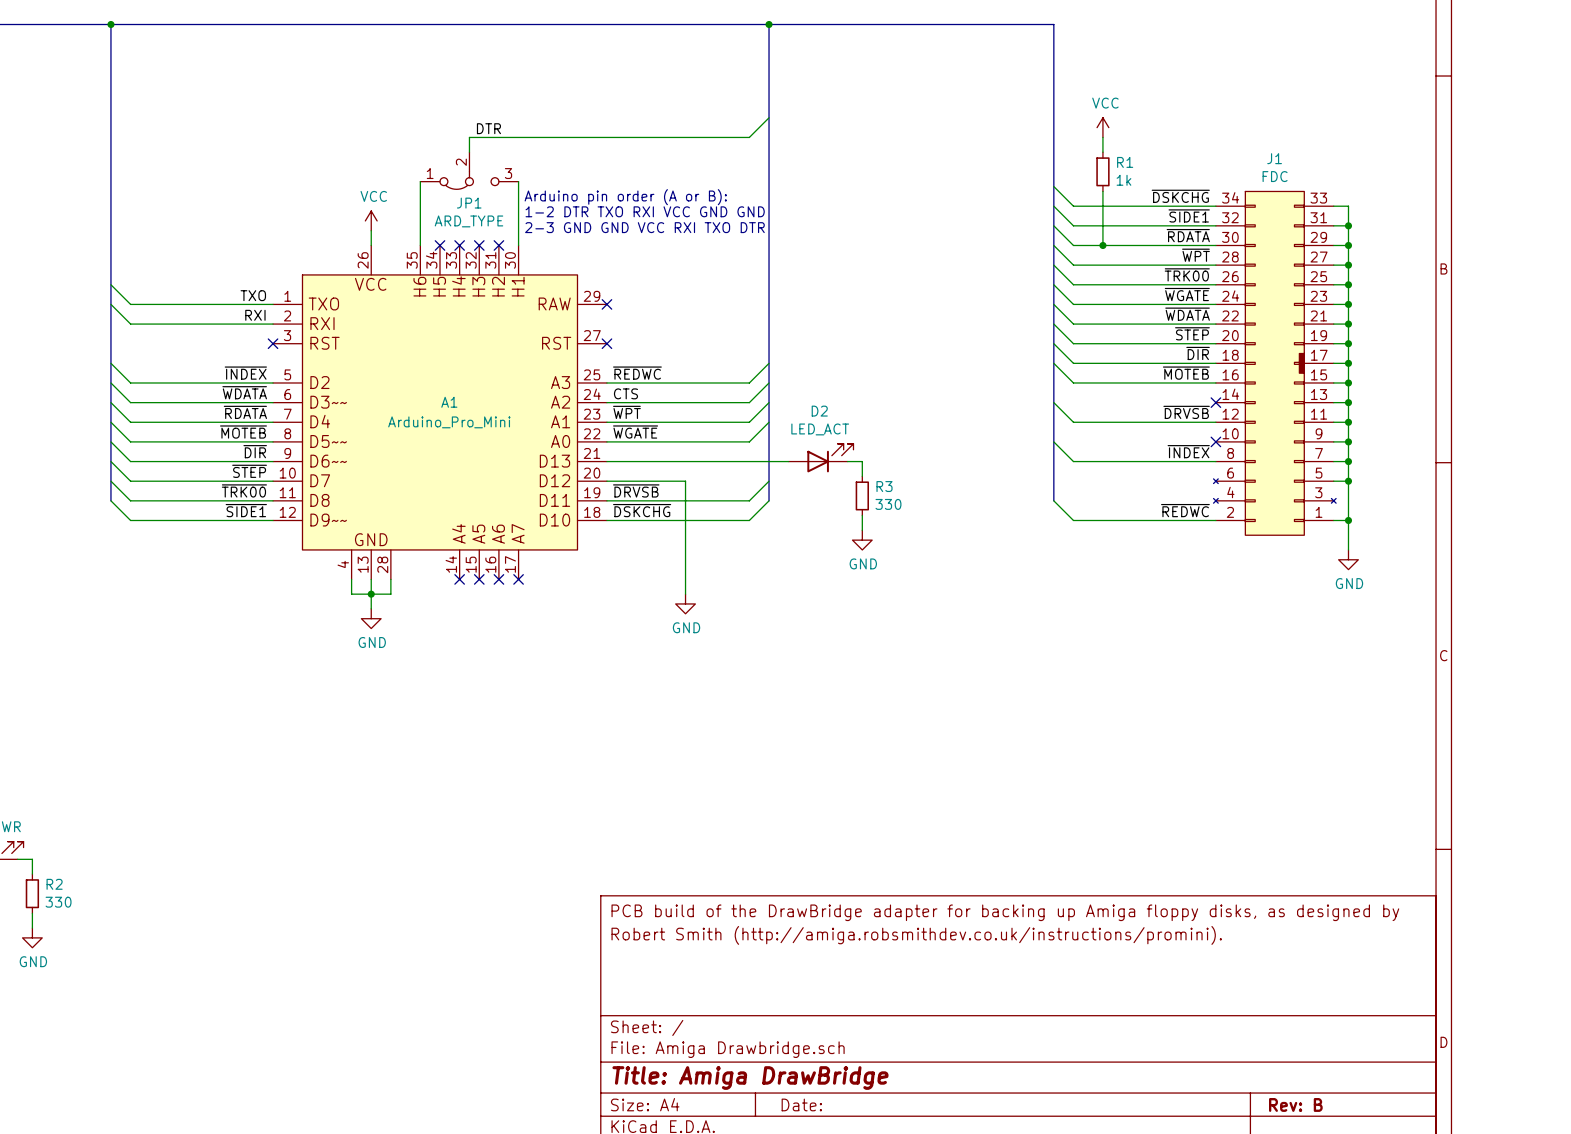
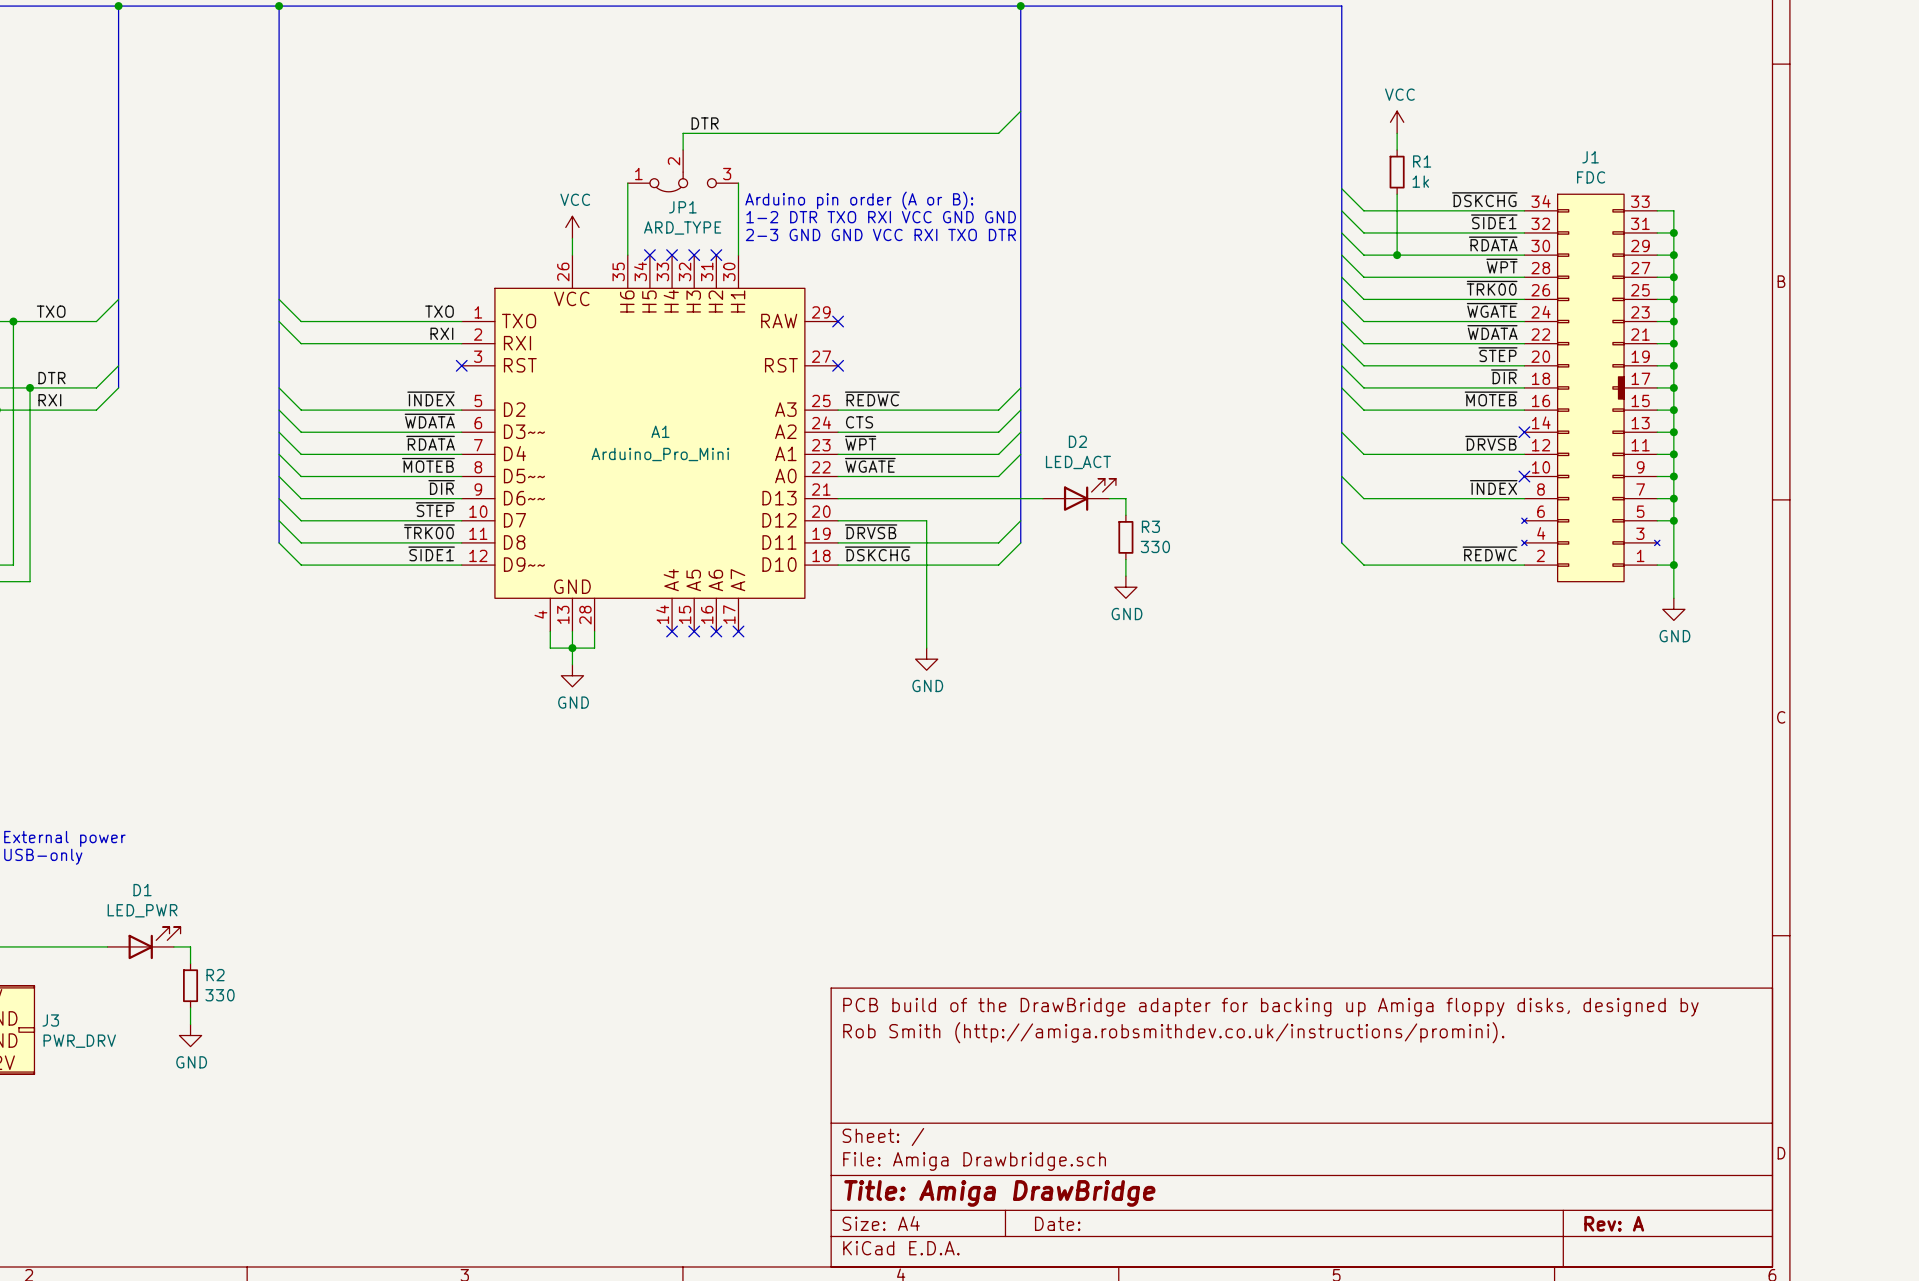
title block: PCB build of the DrawBridge adapter for backing up Amiga floppy disks, as designed by (1005, 912) -> PCB build of the DrawBridge adapter for backing up Amiga floppy disks, designed by (1270, 1007)
title block: Robert Smith (http://amiga.robsmithdev.co.uk/instructions/promini). (916, 935) -> Rob Smith (http://amiga.robsmithdev.co.uk/instructions/promini). (1173, 1032)
title block: Rev: B (1295, 1104) -> Rev: A (1614, 1223)

